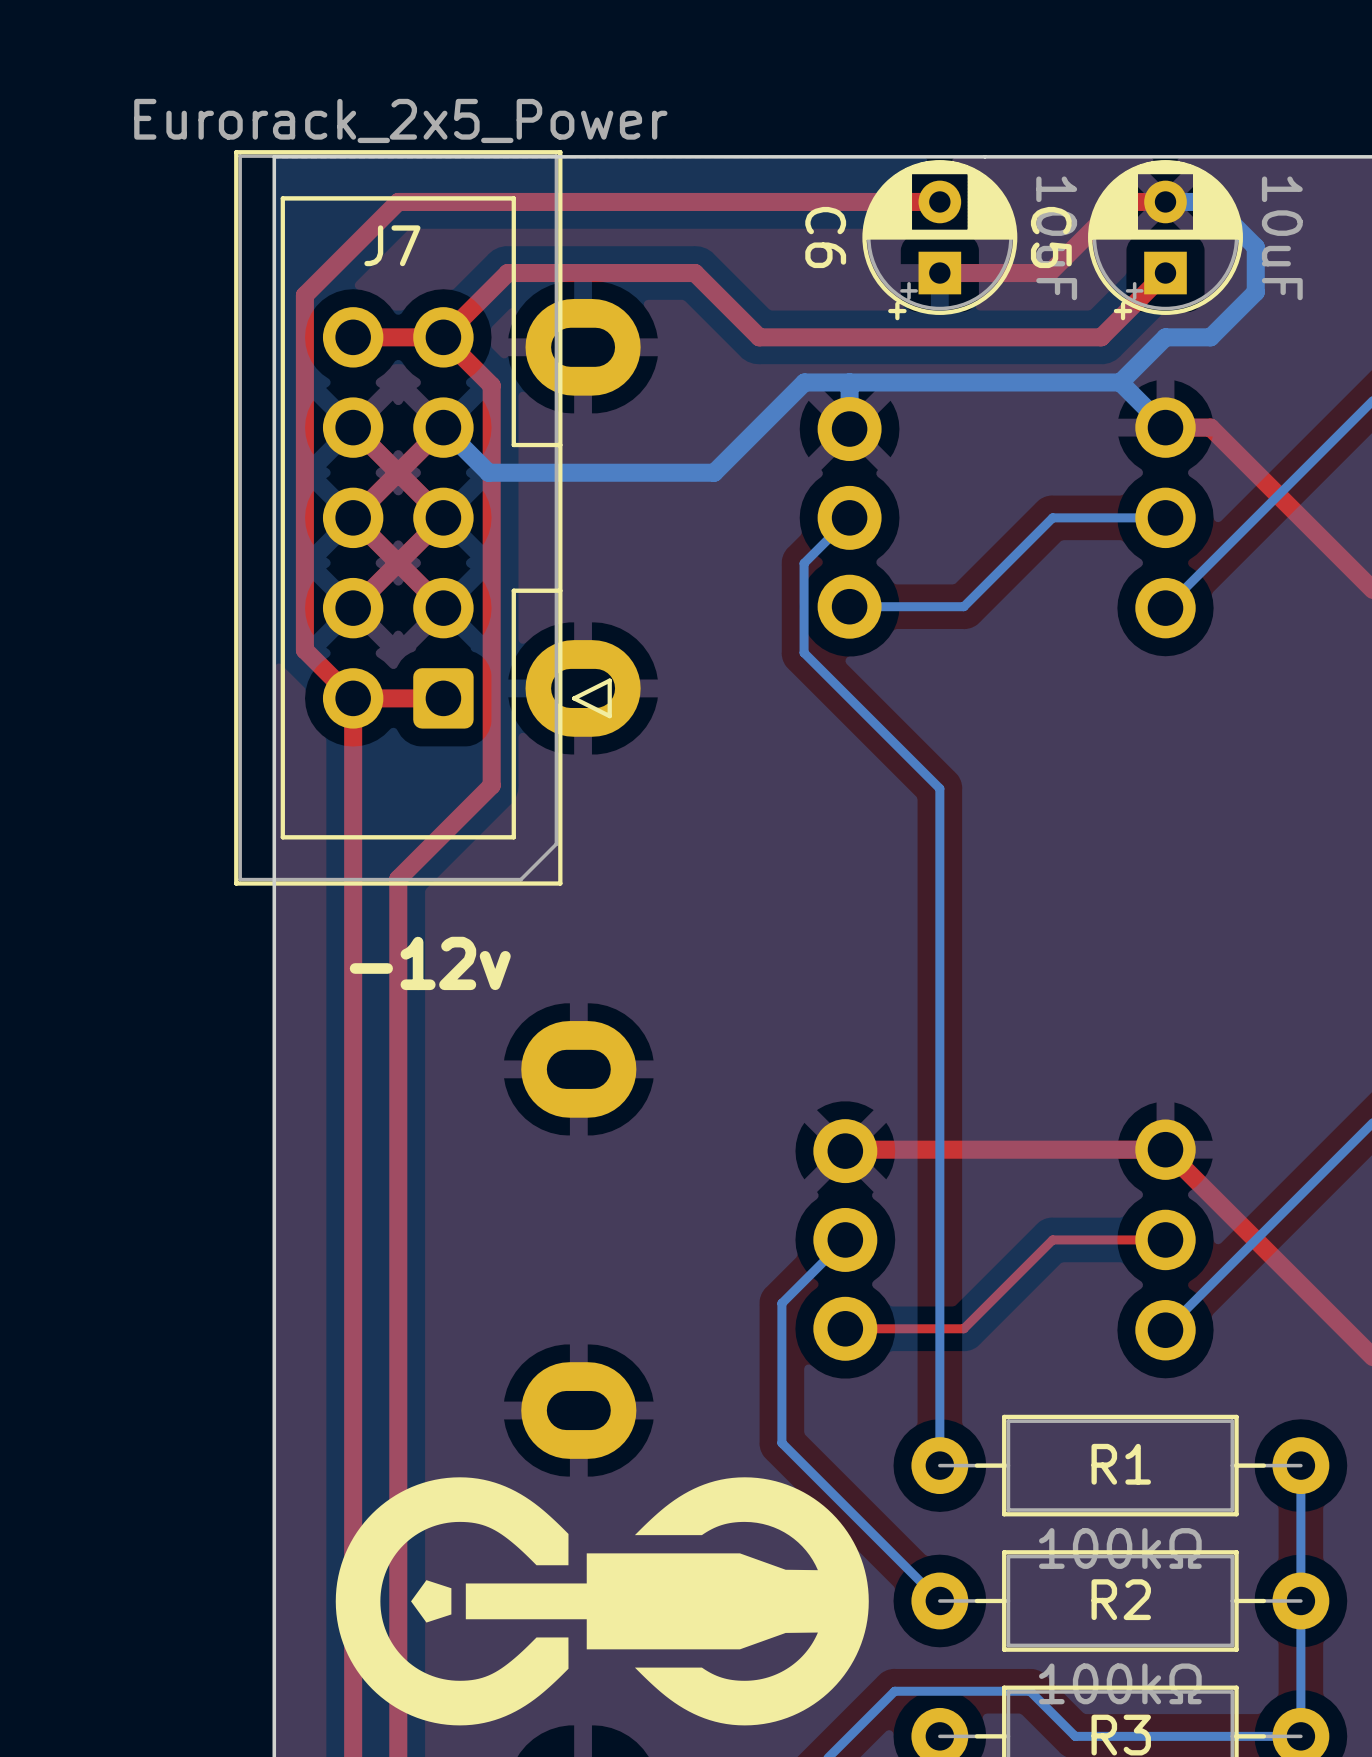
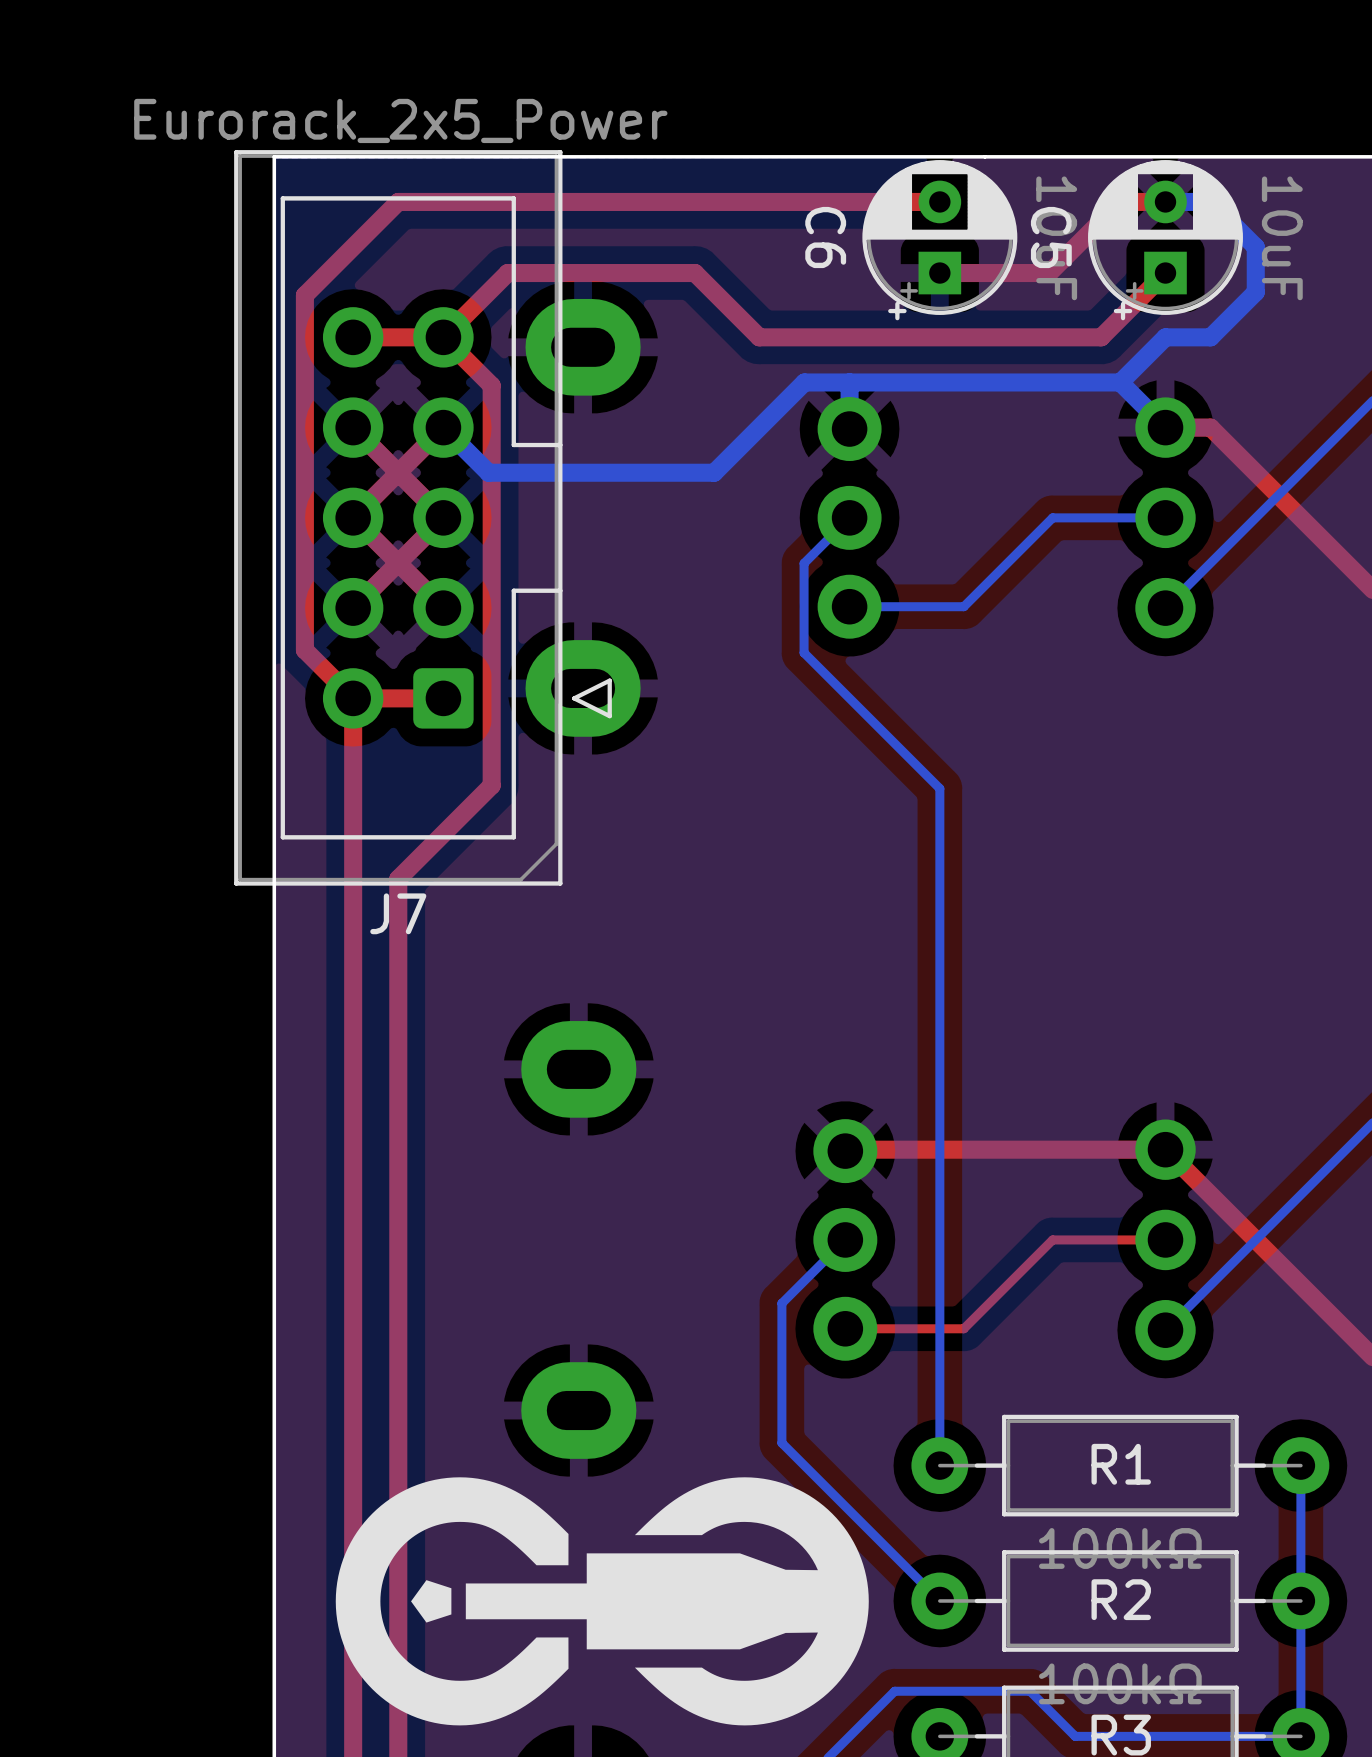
J7 name position: J7 (392, 245) -> J7 (398, 913)
text: -12v (430, 963) -> none

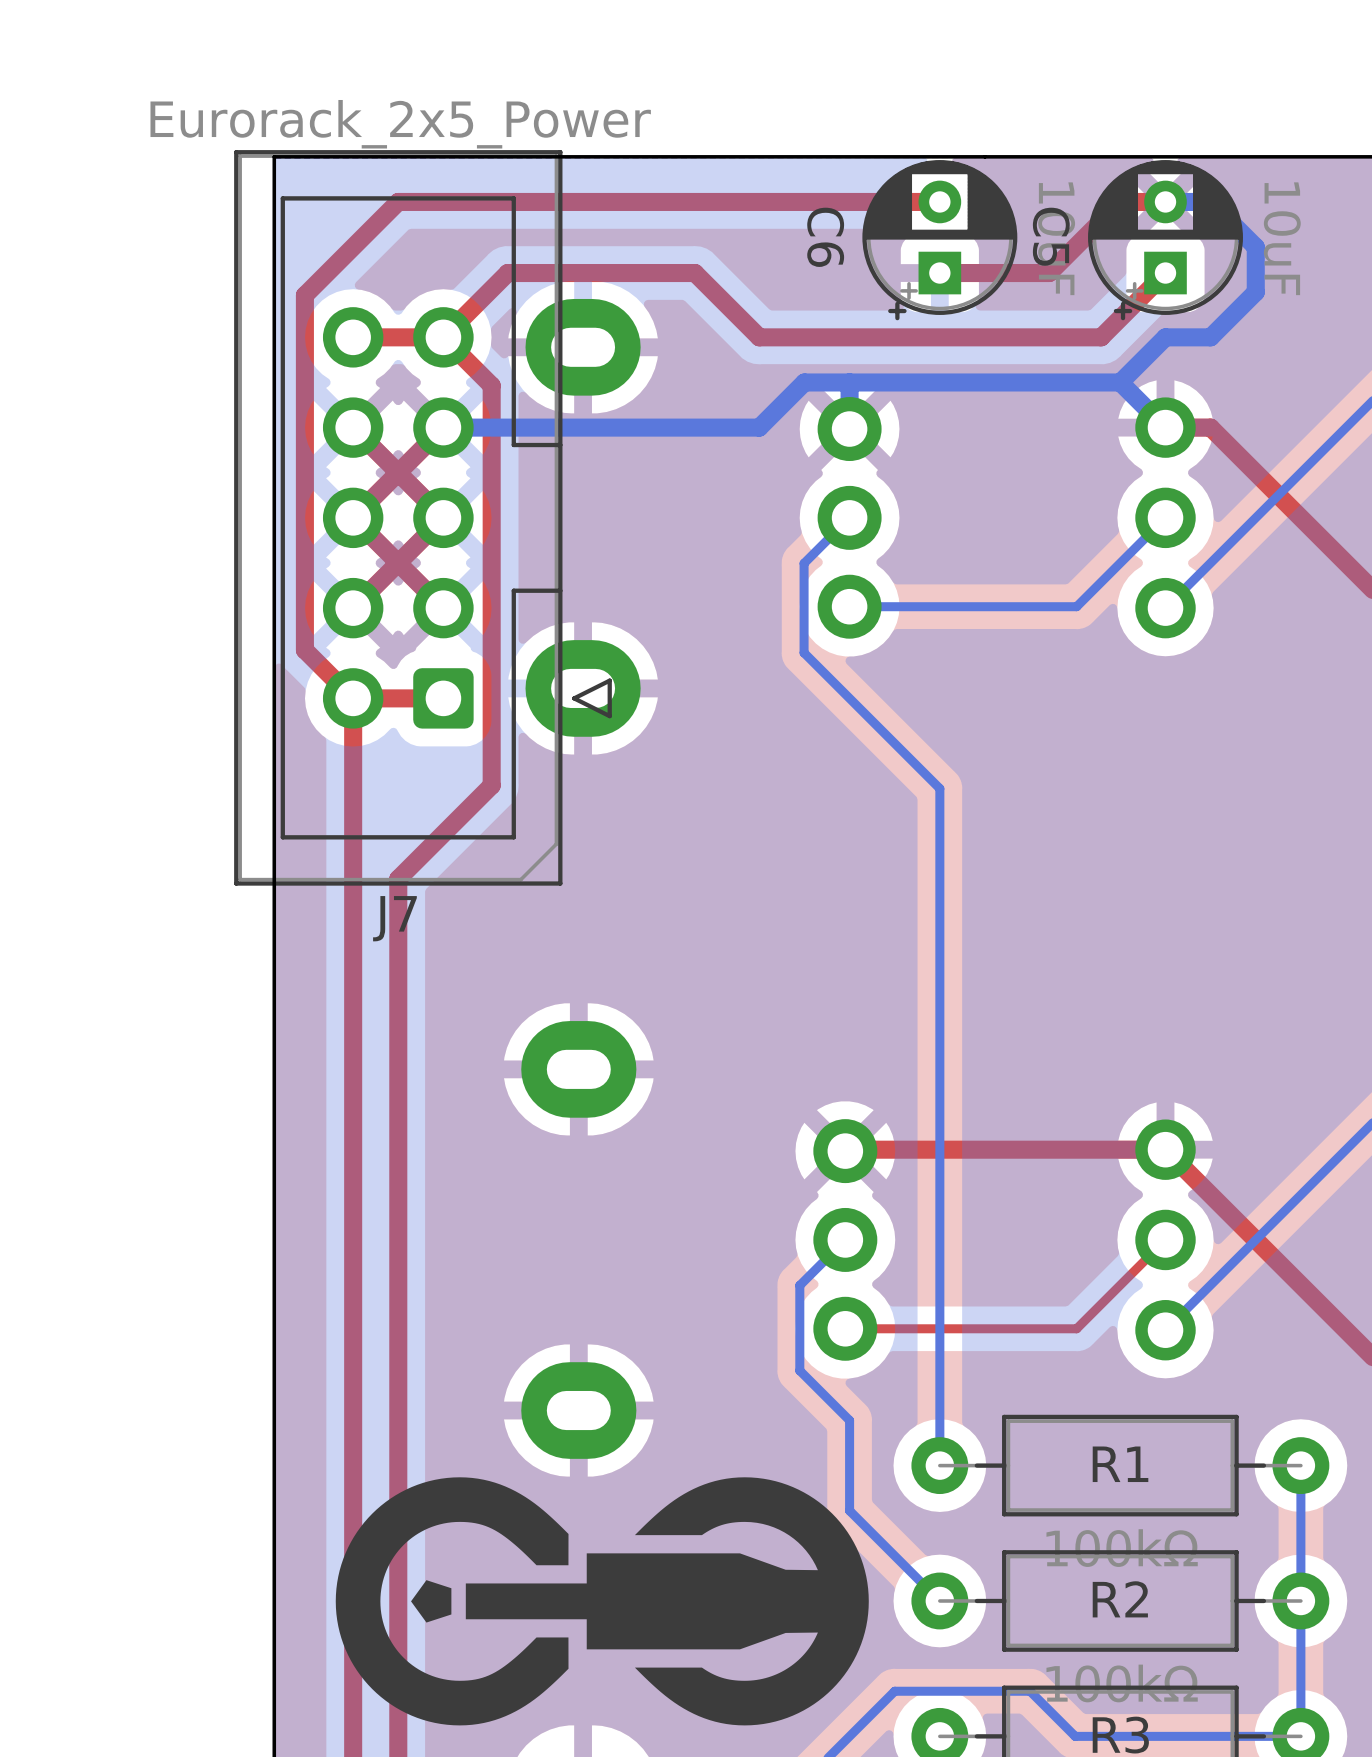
bottom track: (759, 427) (714, 472) (488, 472) (443, 427) -> (759, 427) (443, 427)
bottom track: (1165, 517) (1052, 517) (963, 606) -> (1165, 517) (1076, 606) (963, 606)
top track: (1165, 1239) (1052, 1239) (963, 1328) -> (1165, 1239) (1076, 1328) (963, 1328)
bottom track: (799, 1285) (781, 1303) (781, 1443) (849, 1510) -> (799, 1285) (799, 1370) (849, 1420) (849, 1510)

